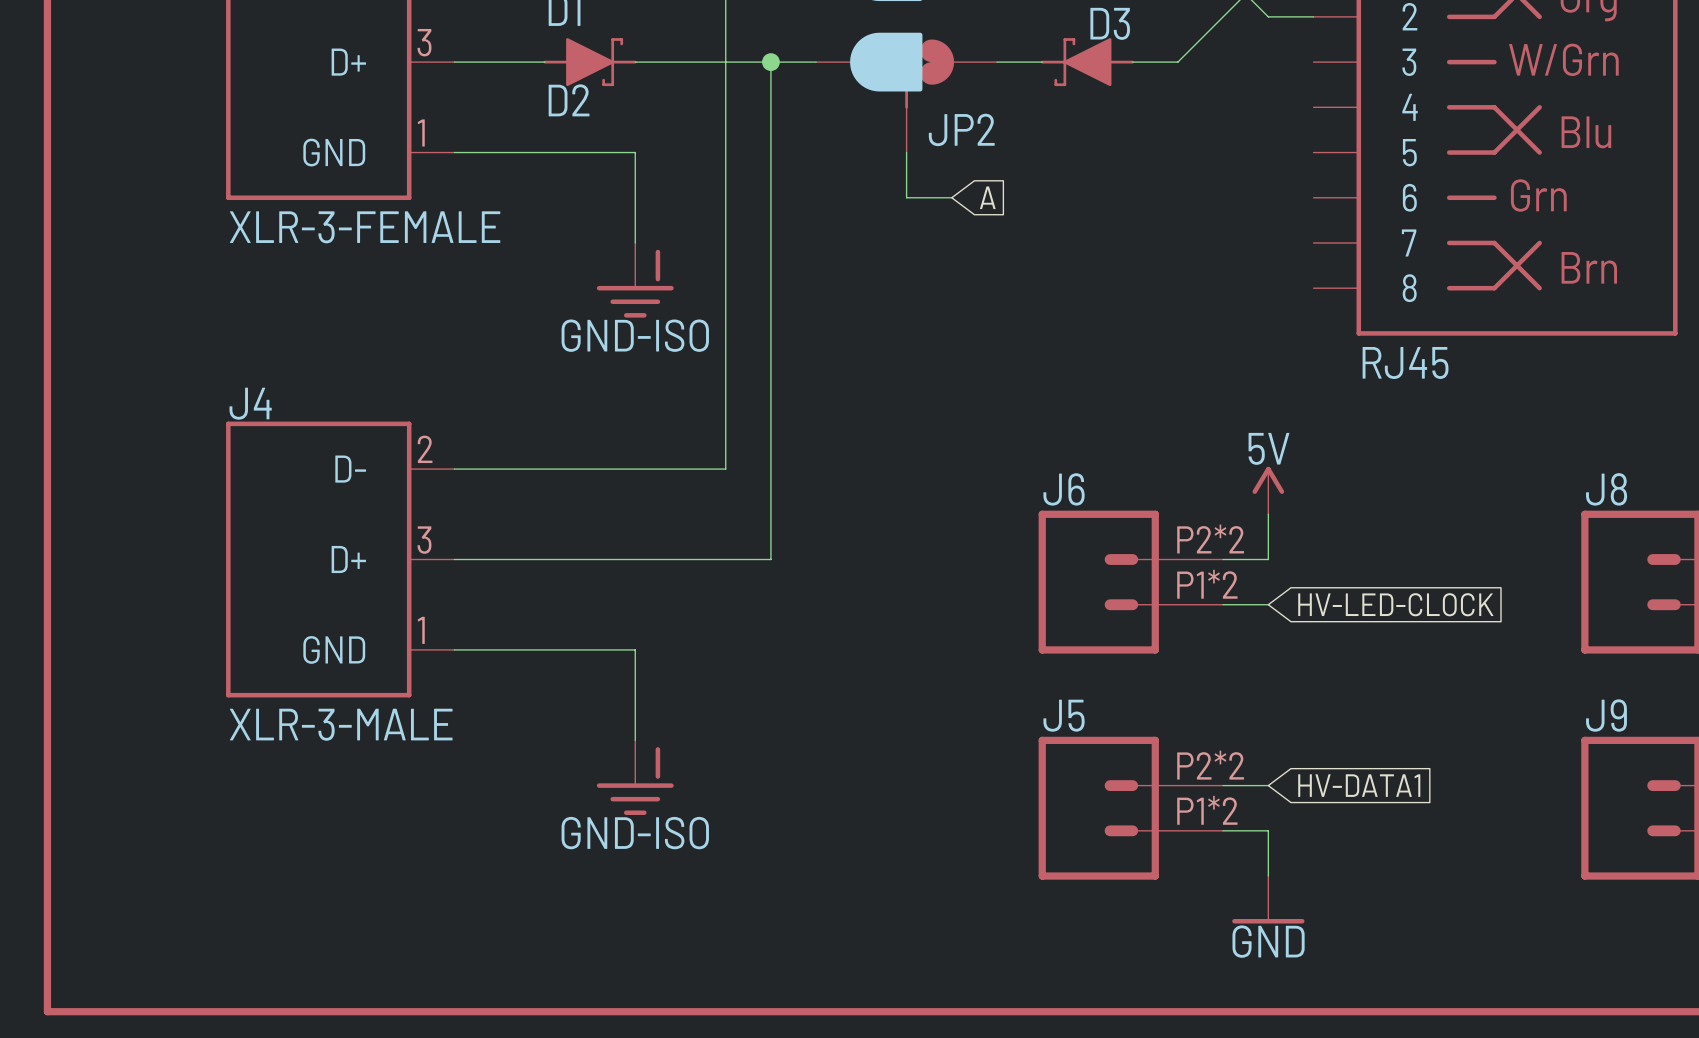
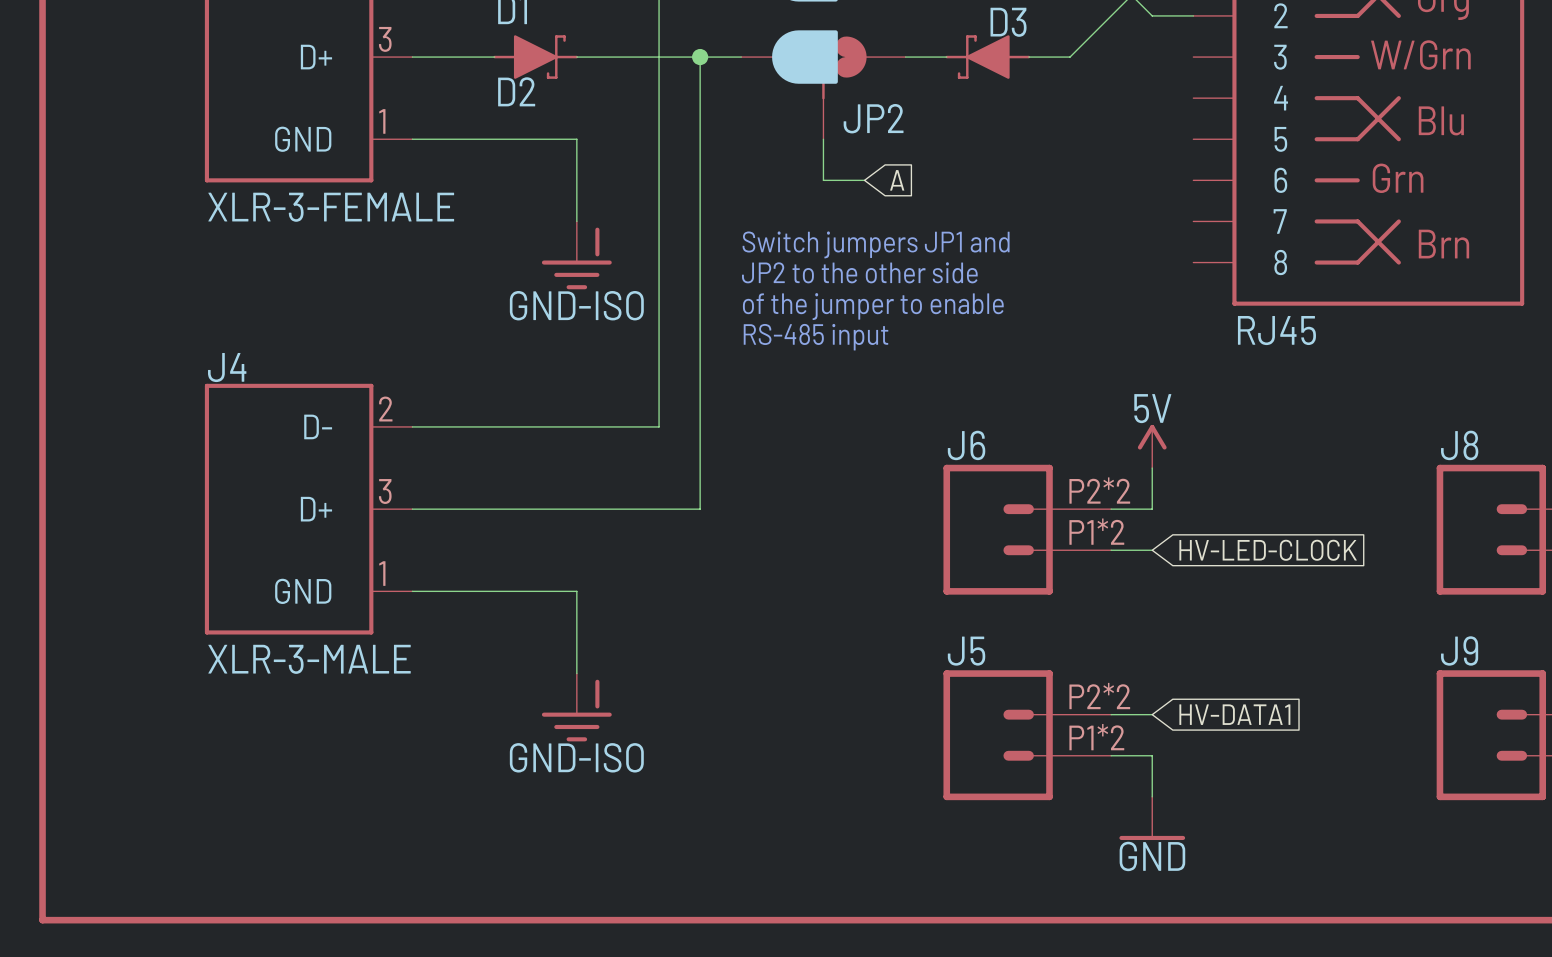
text: none -> Switch jumpers JP1 and (876, 244)
text: none -> JP2 to the other side (859, 272)
text: none -> of the jumper to enable (873, 306)
text: none -> RS-485 input (816, 337)

